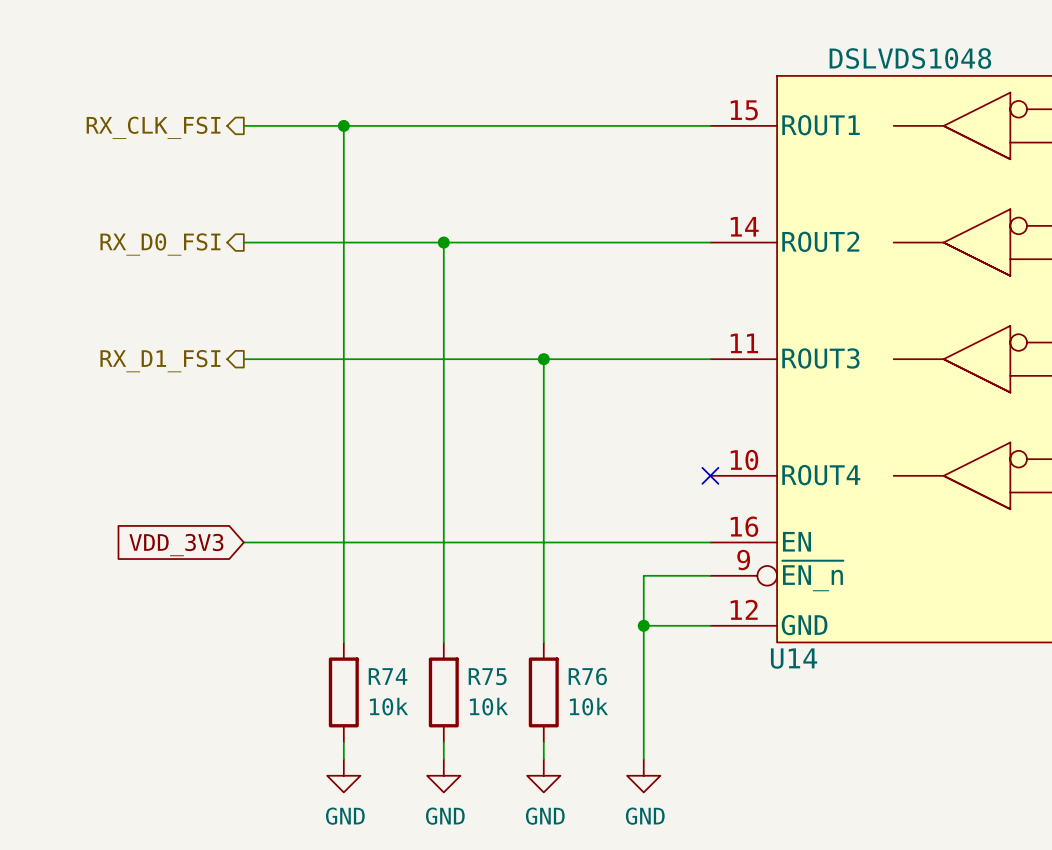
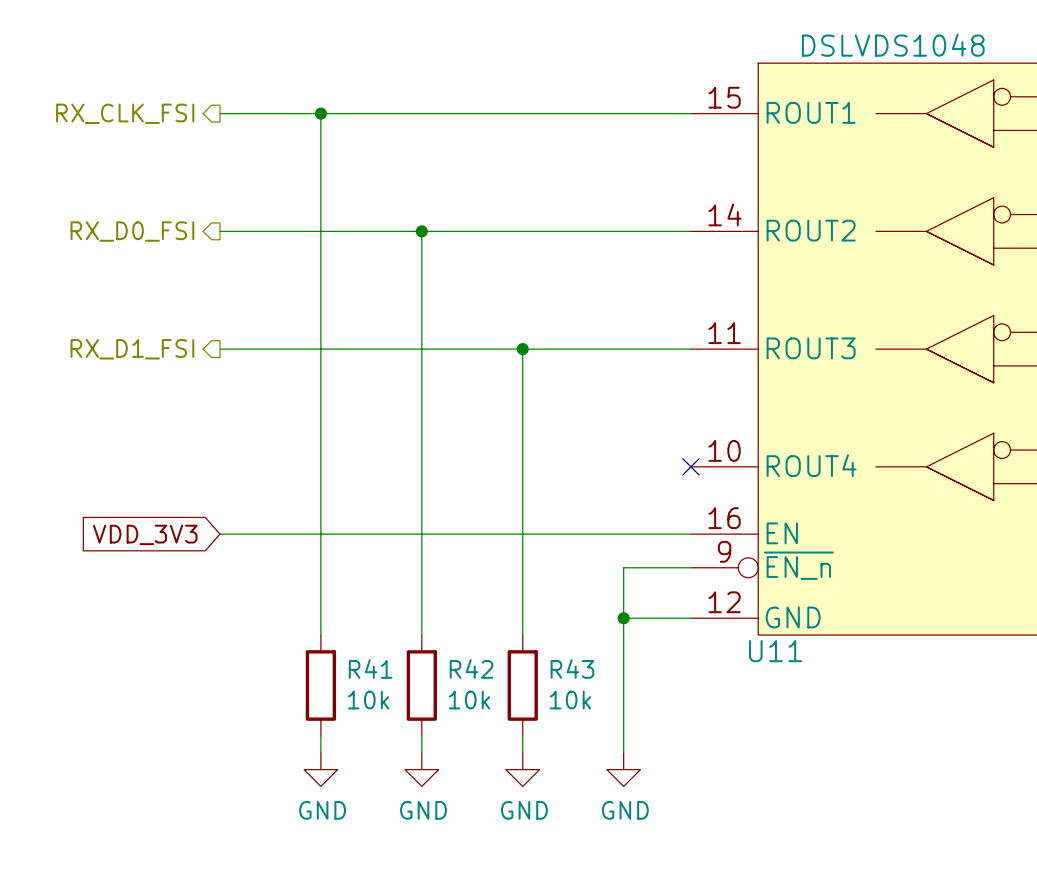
U14 name: U14 (794, 658) -> U11 (775, 651)
R74 name: R74 (388, 676) -> R41 (370, 669)
R75 name: R75 (487, 676) -> R42 (471, 669)
R76 name: R76 (587, 676) -> R43 (572, 669)

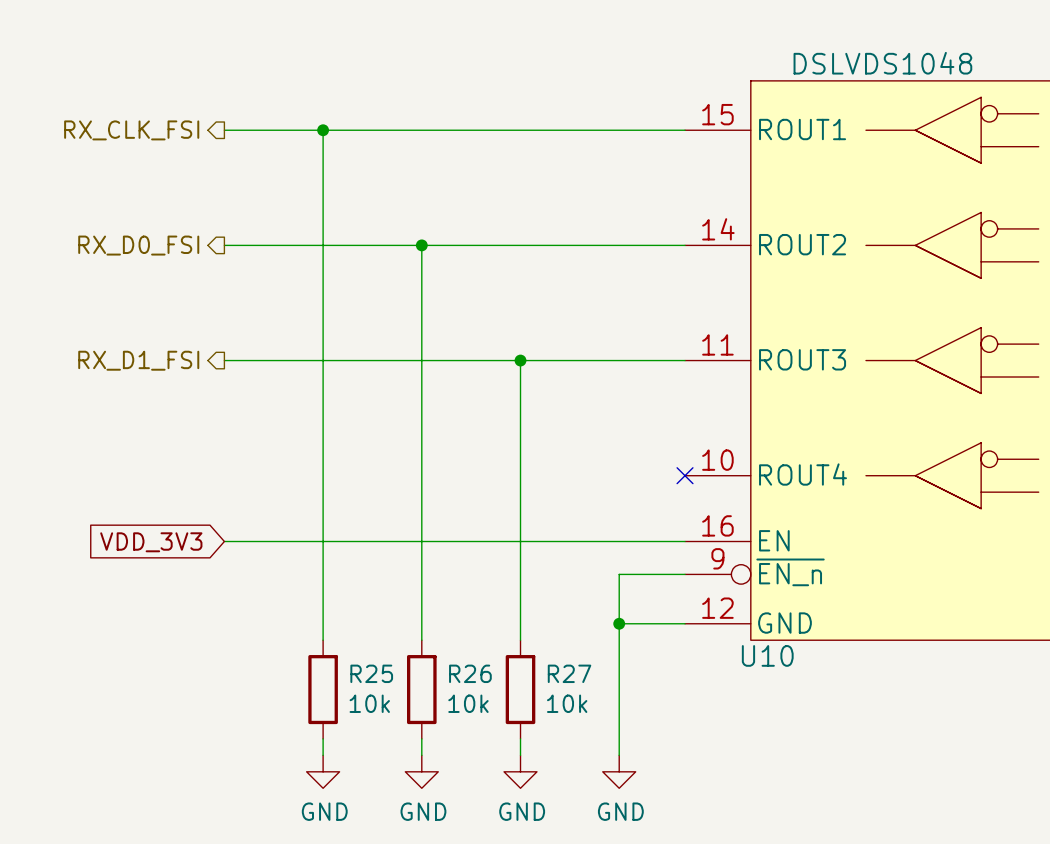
U11 name: U11 (775, 651) -> U10 (767, 655)
R41 name: R41 (370, 669) -> R25 (371, 673)
R42 name: R42 (471, 669) -> R26 (470, 673)
R43 name: R43 (572, 669) -> R27 (569, 673)

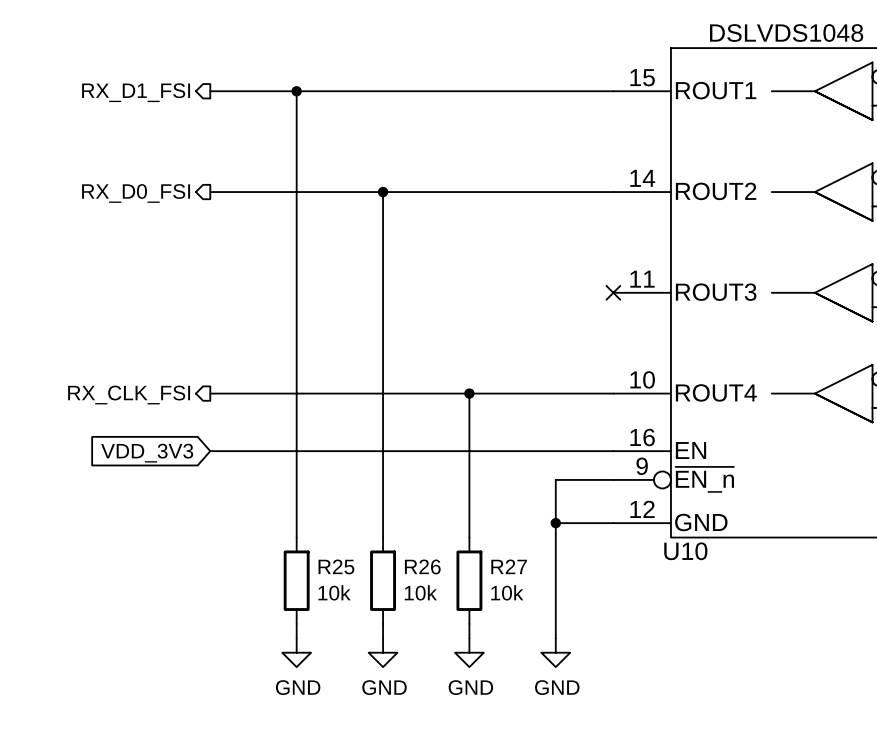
hierarchical label: RX_CLK_FSI (131, 130) -> RX_D1_FSI (136, 92)
hierarchical label: RX_D1_FSI (138, 360) -> none
wire: (224, 360) (685, 360) -> (210, 393) (613, 393)
wire: (520, 360) (520, 475) -> none
junction: (520, 360) -> none
no-connect mark: none -> (613, 292)
hierarchical label: none -> RX_CLK_FSI (129, 395)
junction: none -> (469, 393)
no-connect mark: (685, 475) -> none

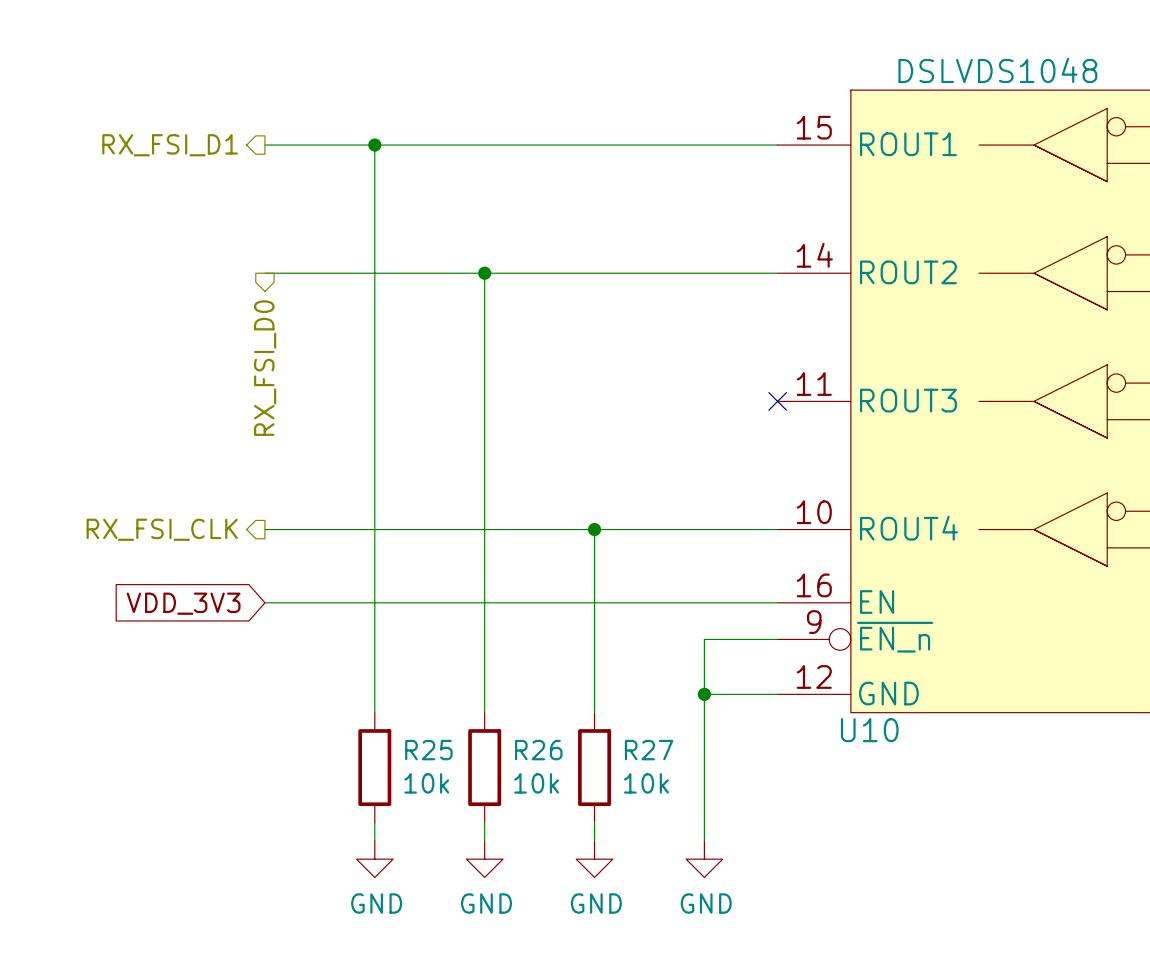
hierarchical label: RX_D1_FSI (136, 92) -> RX_FSI_D1 (170, 145)
hierarchical label: RX_D0_FSI (136, 193) -> none
hierarchical label: none -> RX_FSI_D0 (265, 368)
hierarchical label: RX_CLK_FSI (129, 395) -> RX_FSI_CLK (162, 529)

